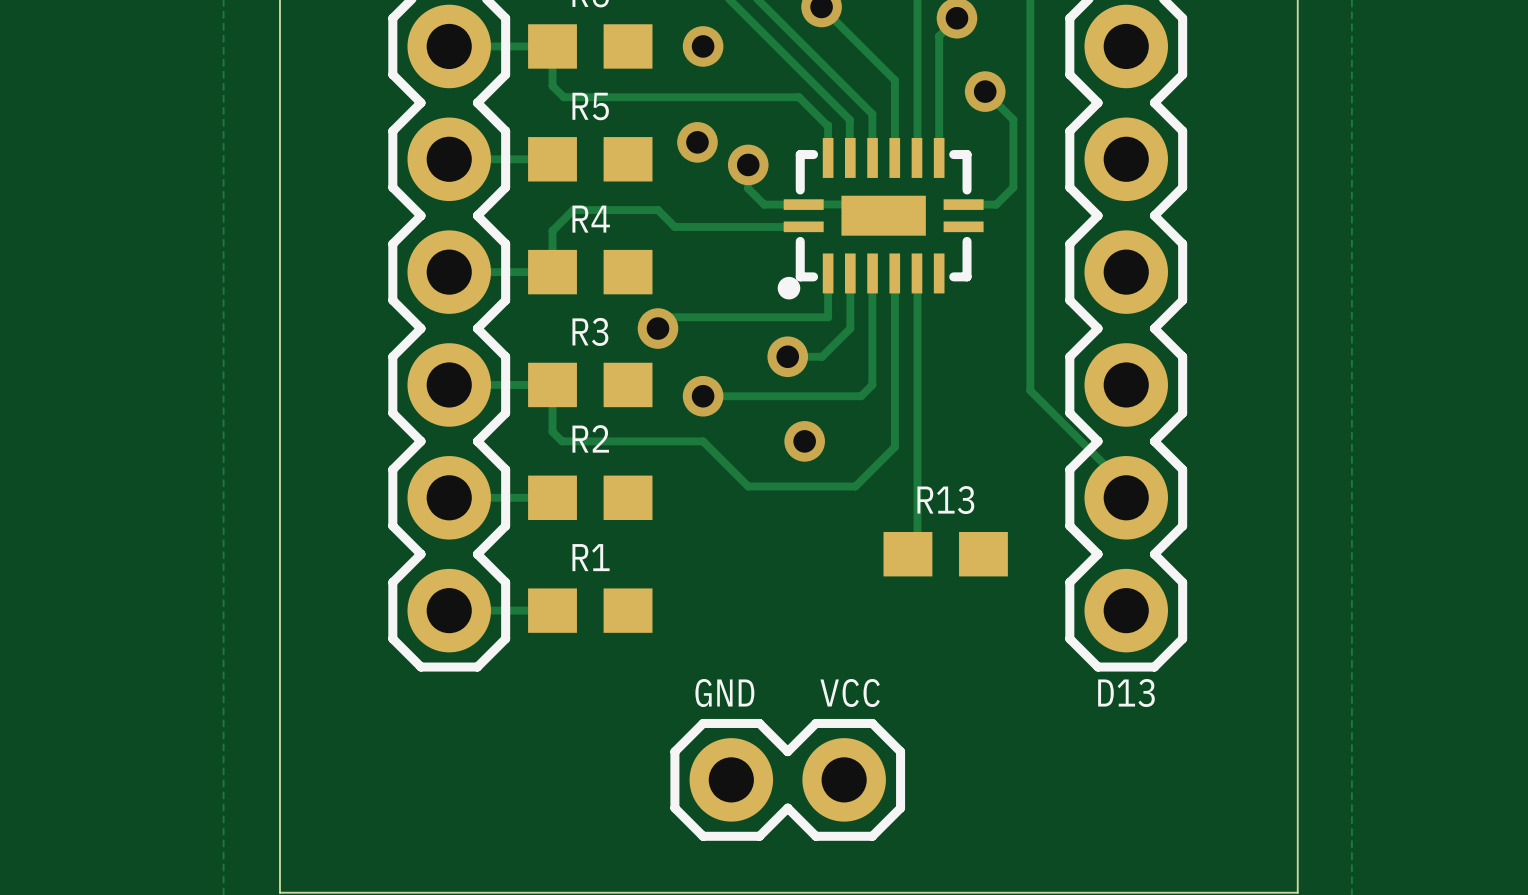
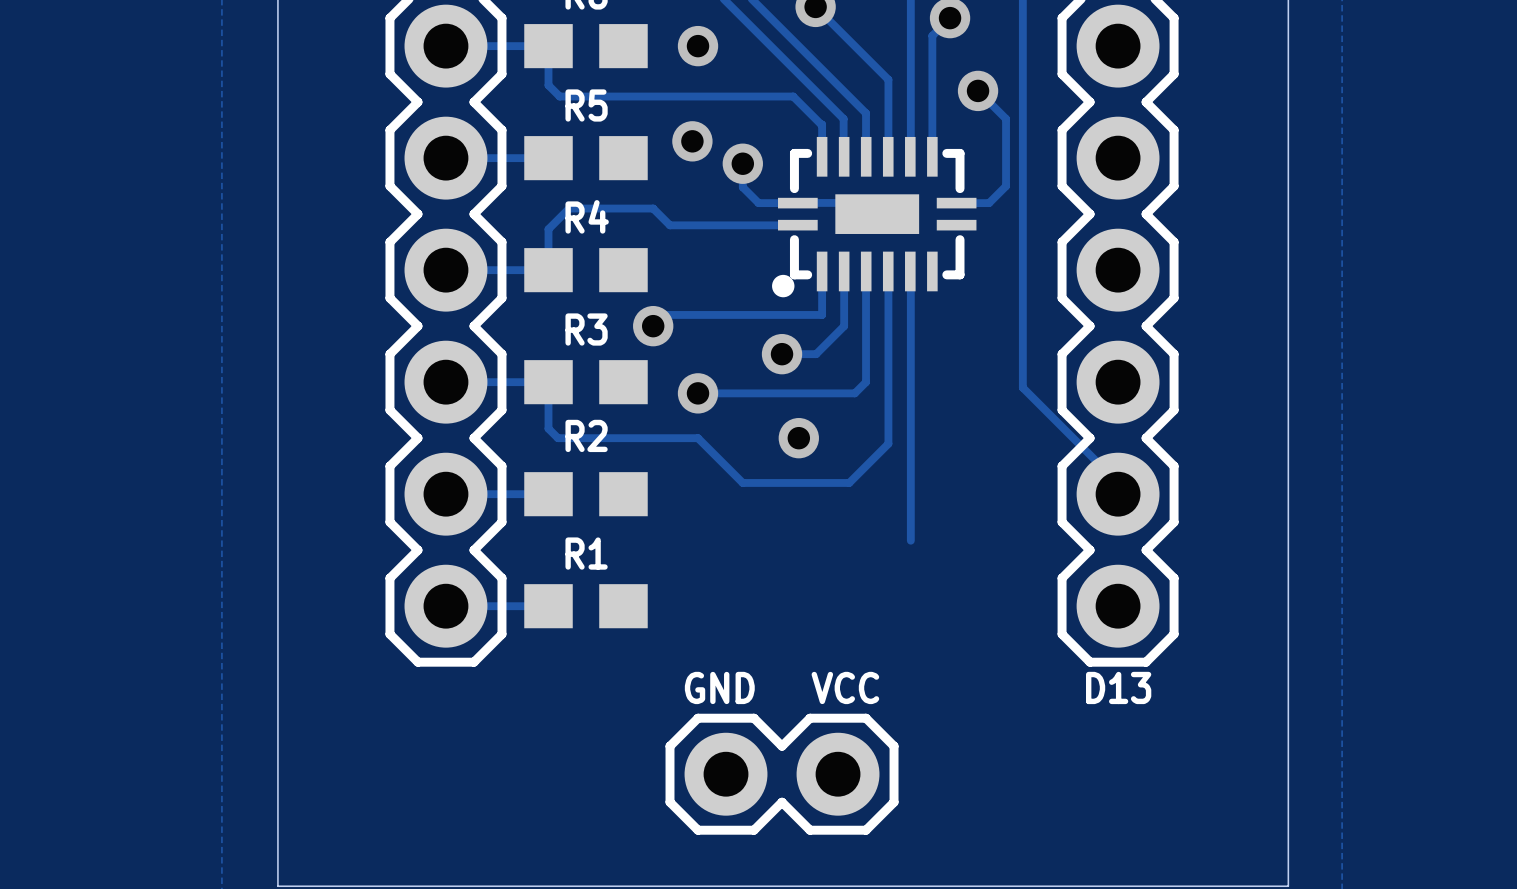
R13: (945, 554) -> none

